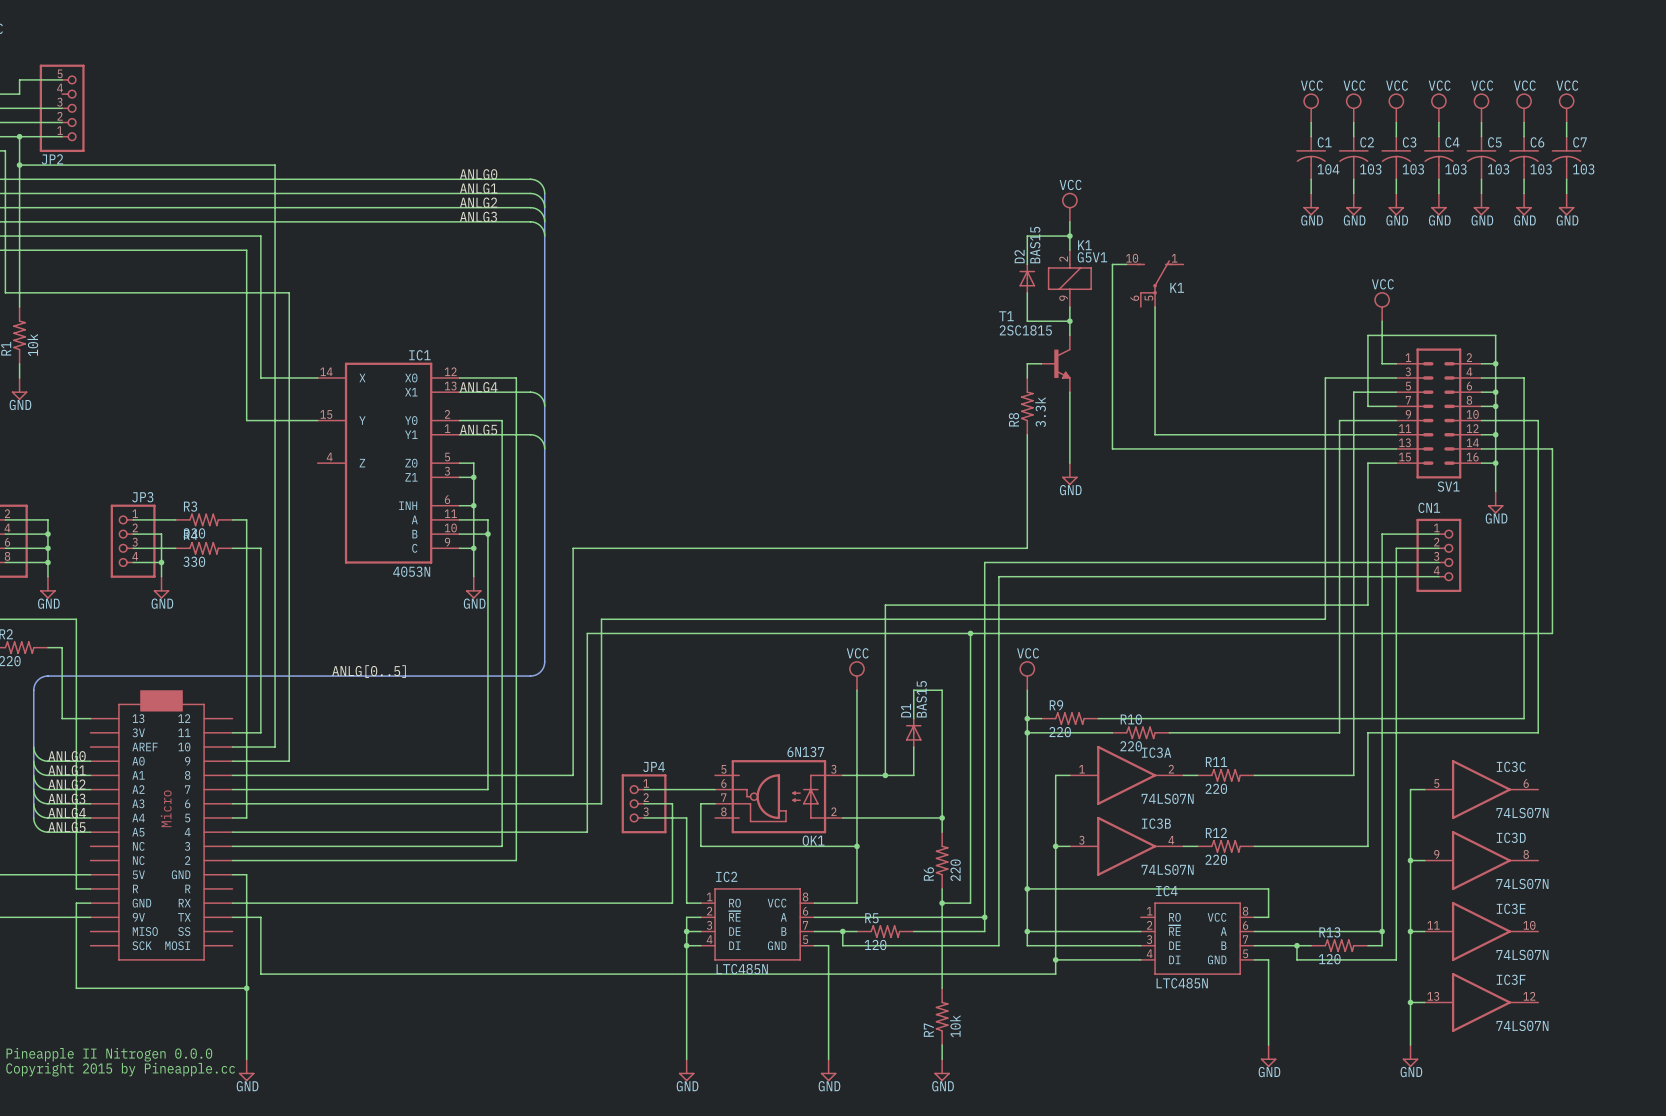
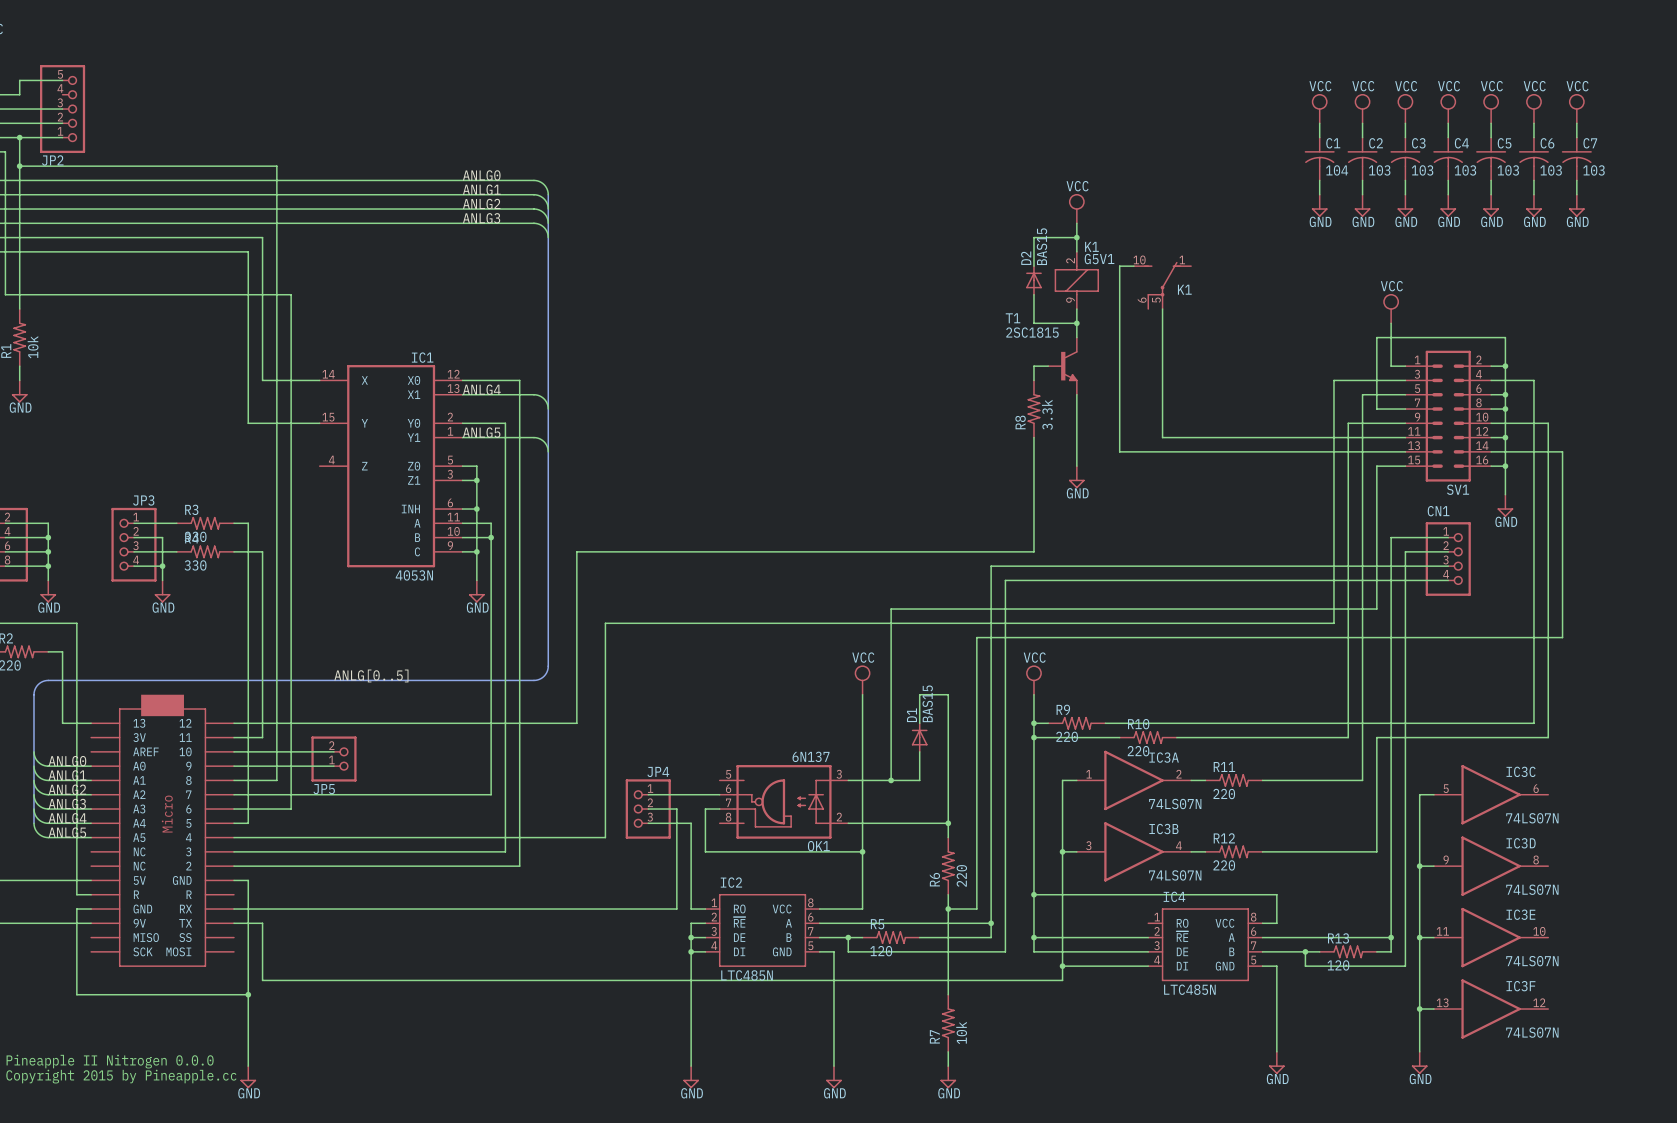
wire: (970, 633) (587, 633) (587, 832) -> (605, 809) (605, 837) (591, 837)
junction: (970, 633) -> none
wire: (573, 718) (573, 775) (275, 775) -> (576, 723) (233, 723)
wire: none -> (333, 751) (276, 751) (276, 780)
JP5: none -> (333, 759)
wire: (289, 803) (601, 803) -> (291, 809) (291, 766) (333, 766)

